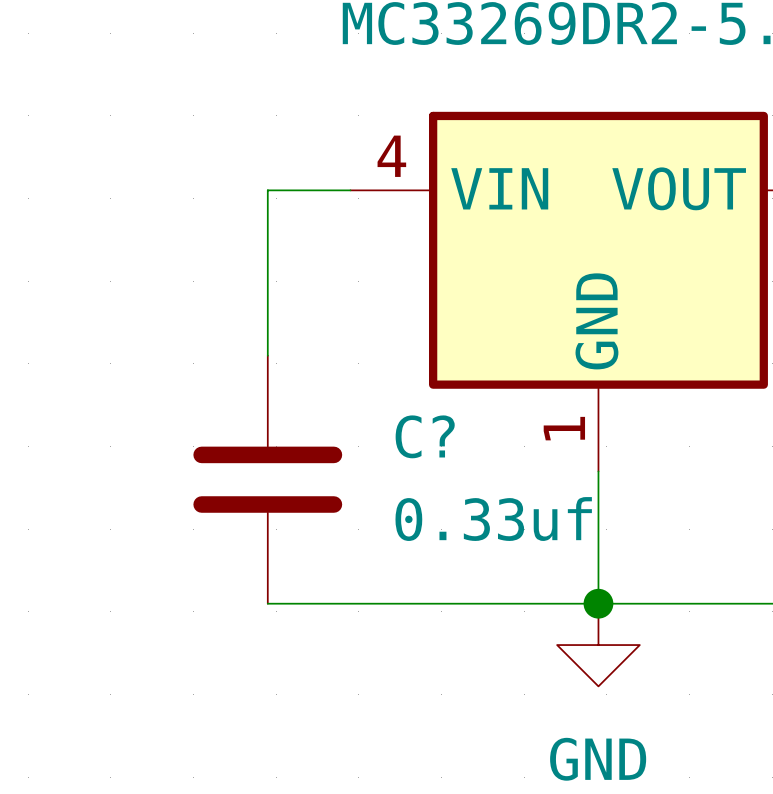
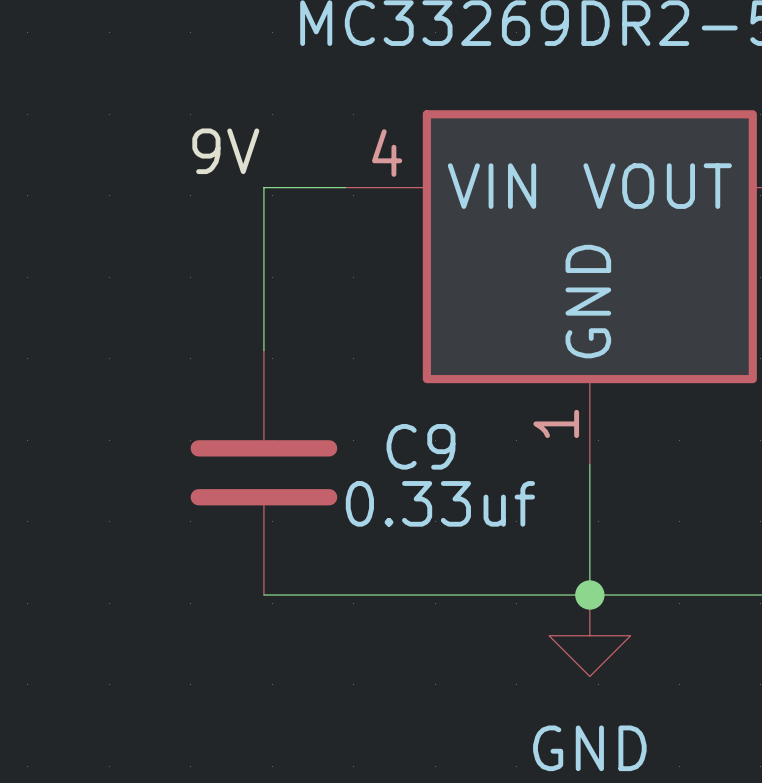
label: none -> 9V (225, 151)
C? name: C? (425, 436) -> C9 (420, 446)
C? value position: 0.33uf (493, 519) -> 0.33uf (440, 503)

